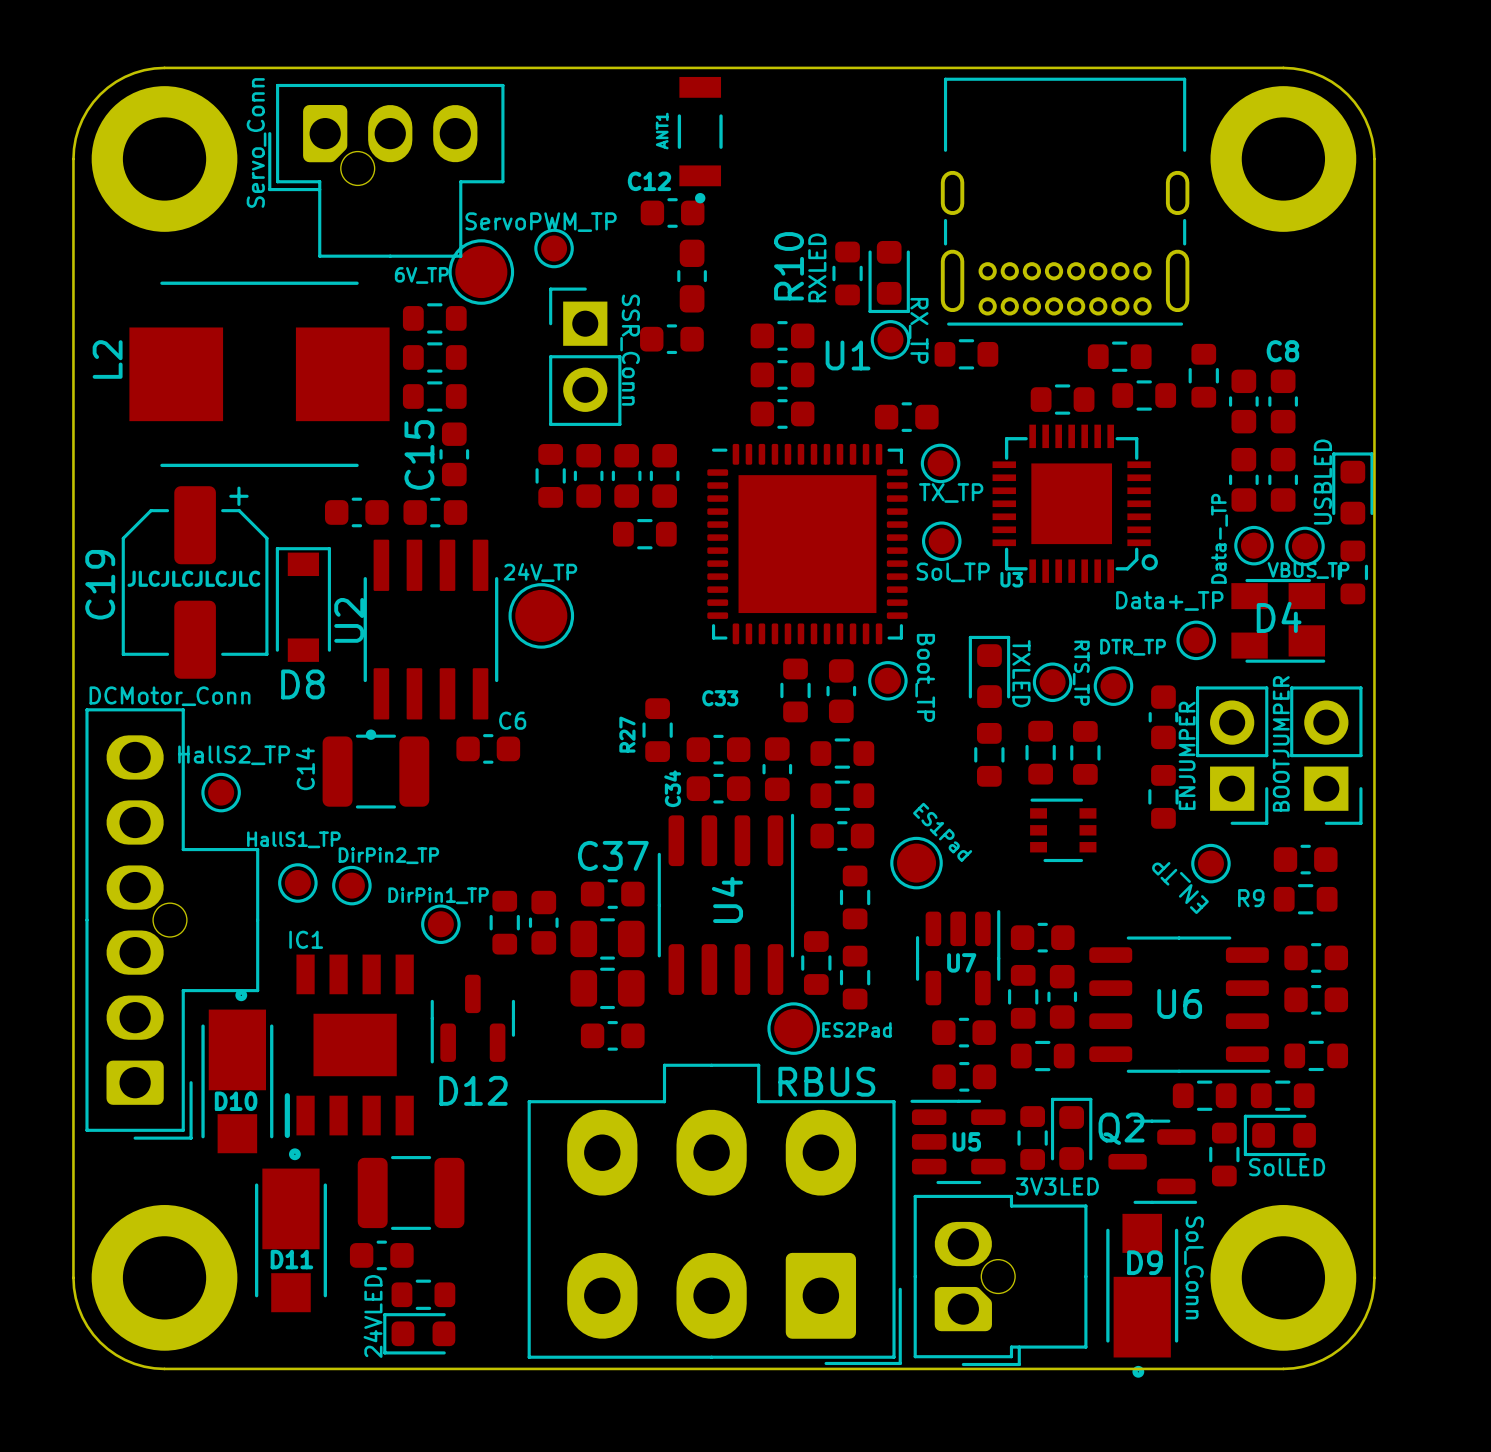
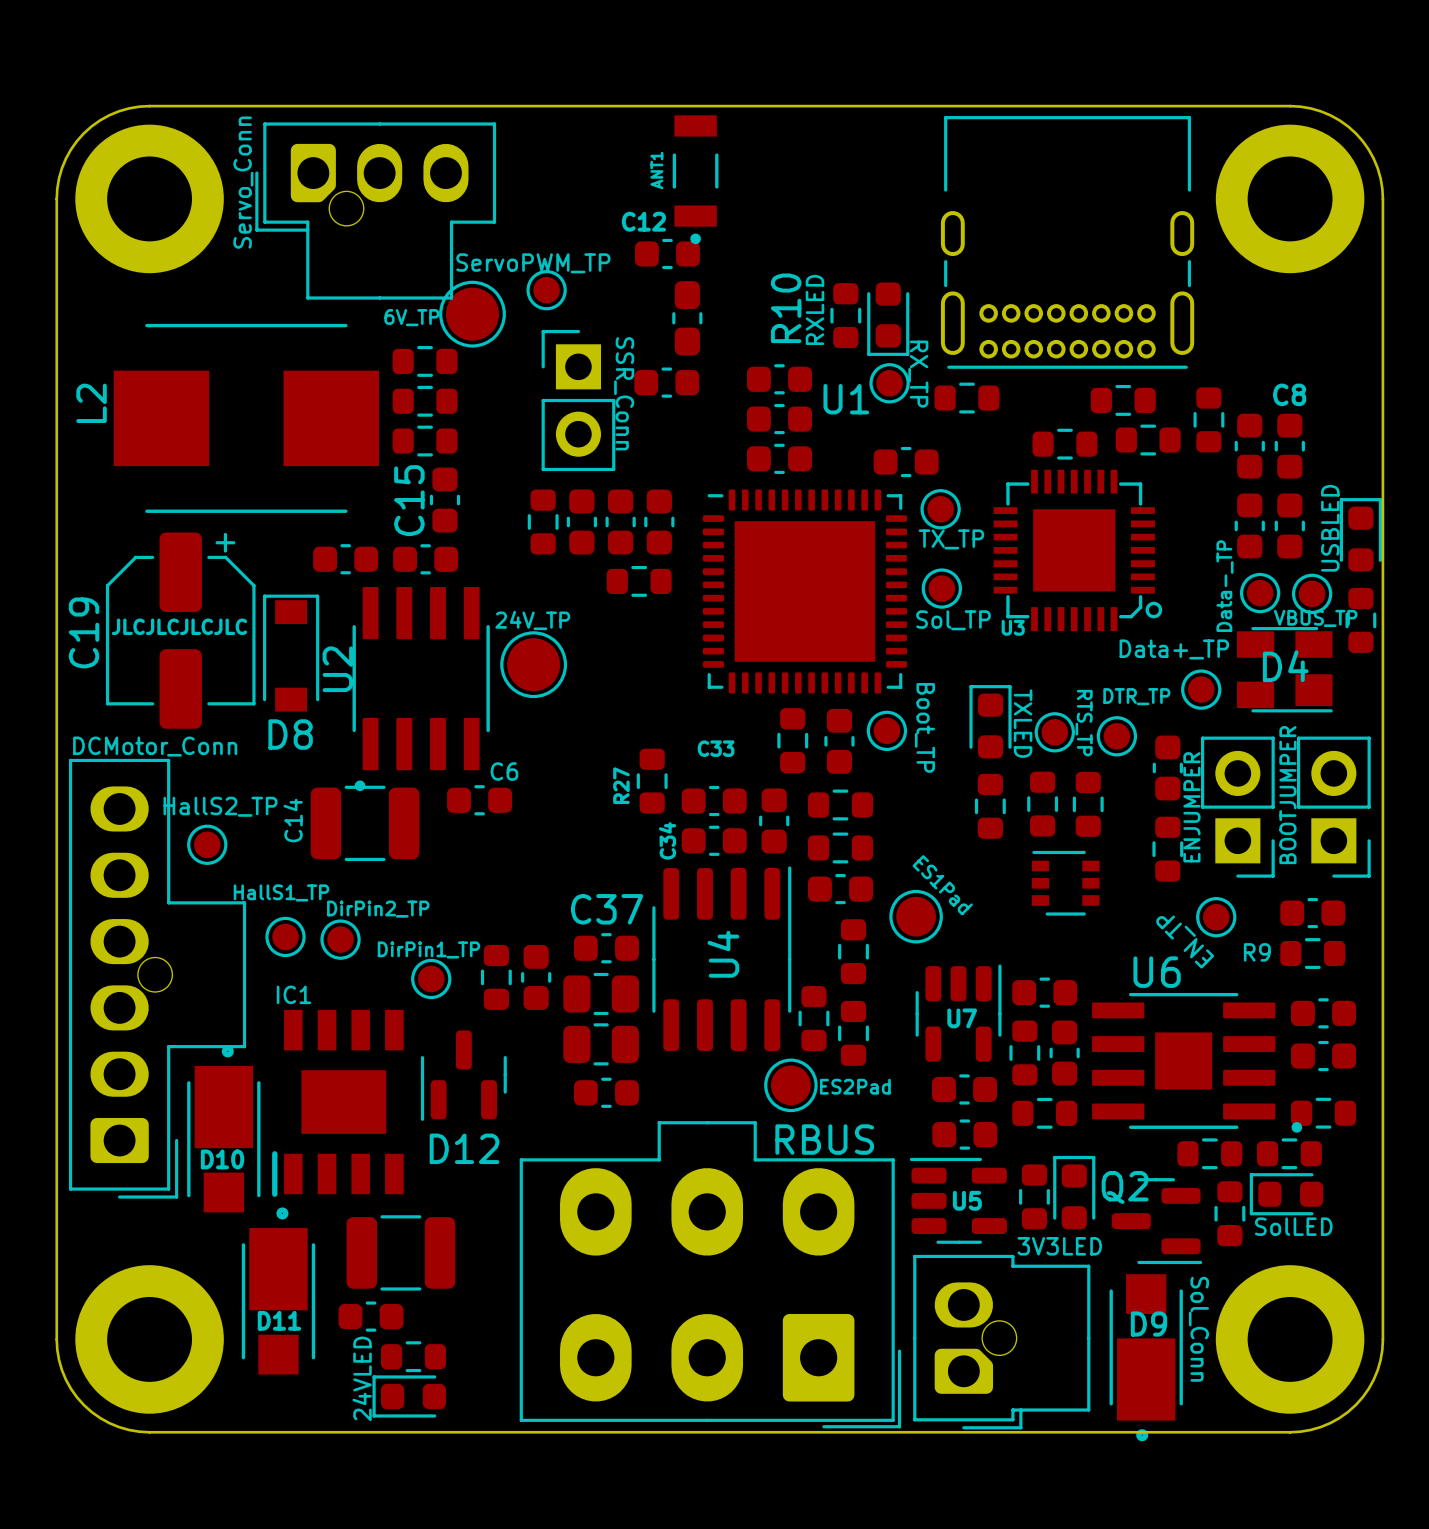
U6 footprint: [1089, 936, 1271, 1073] -> [1092, 992, 1303, 1133]
U6 name position: U6 (1179, 1003) -> U6 (1157, 972)

